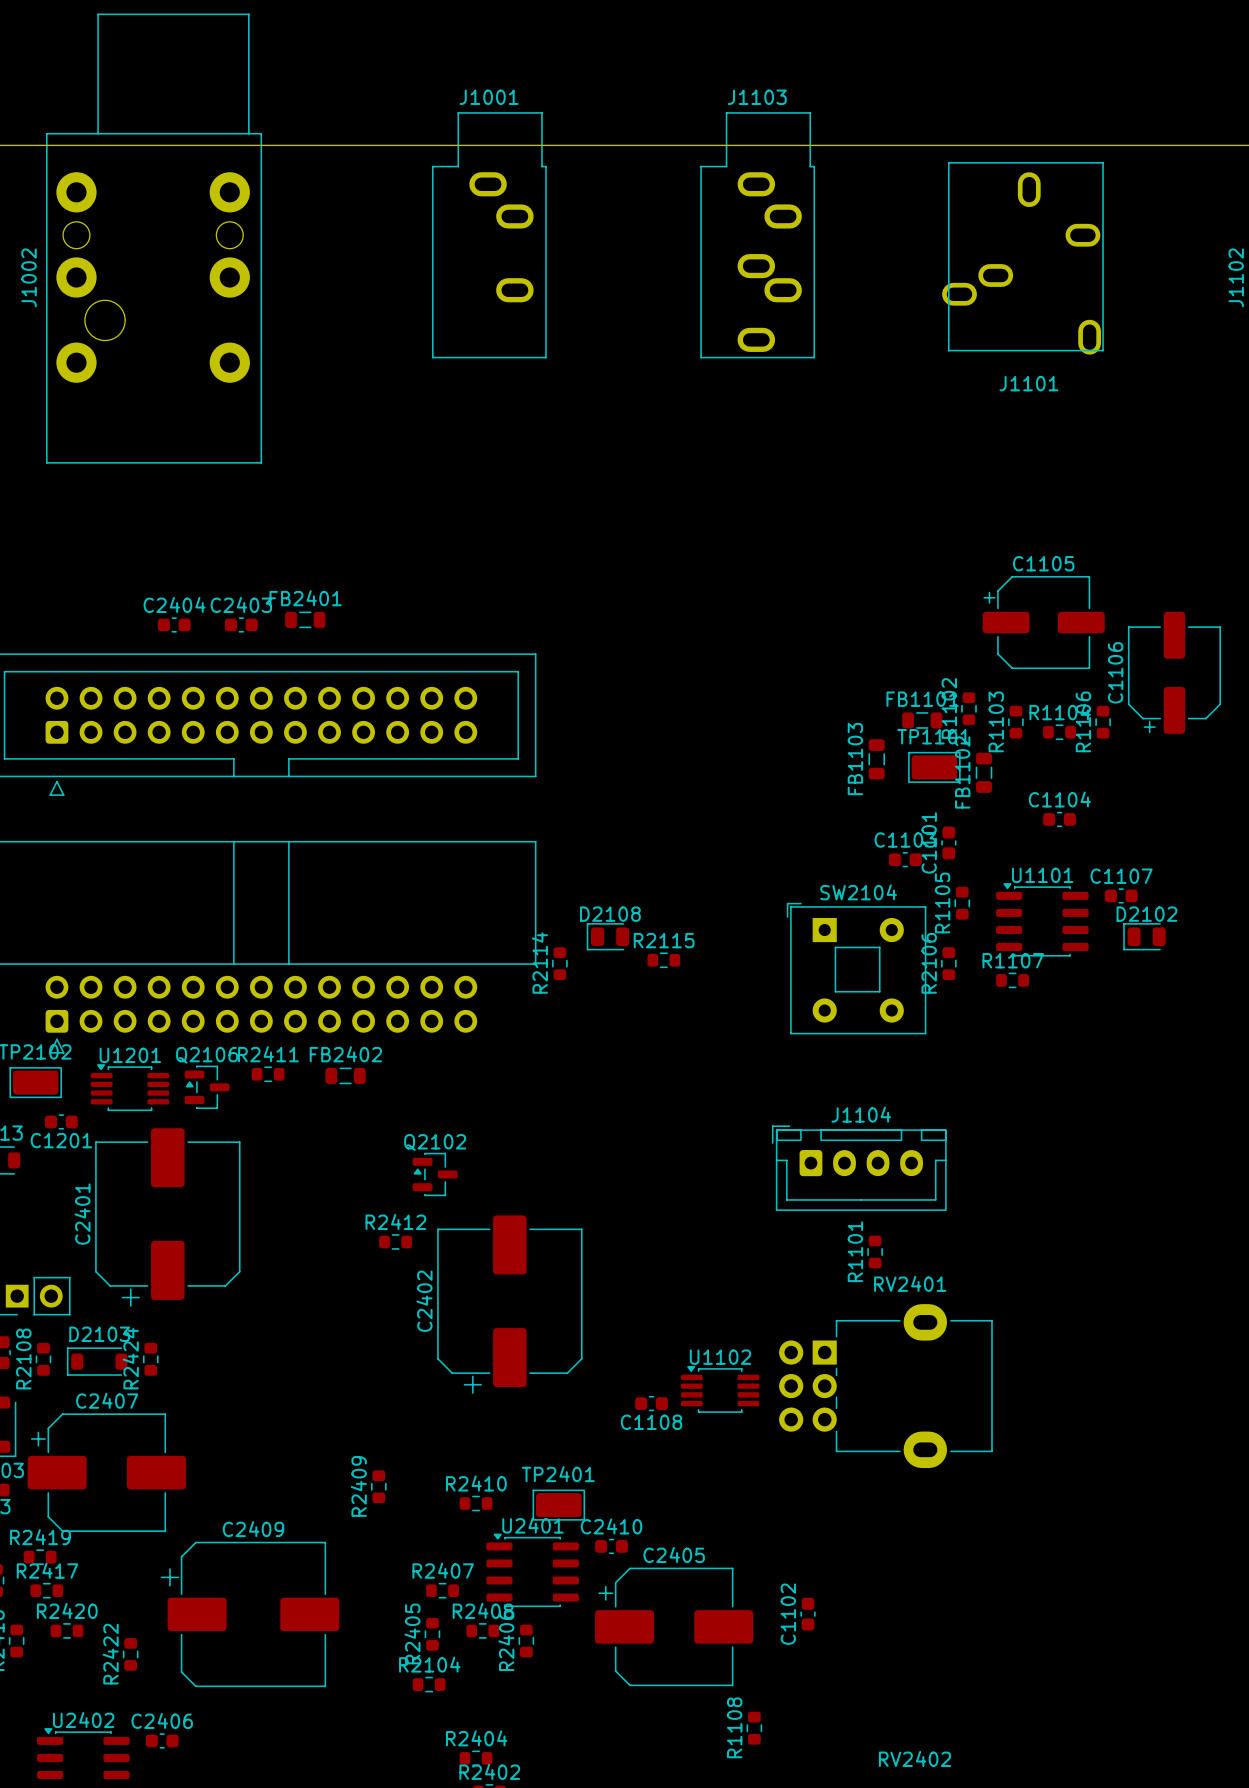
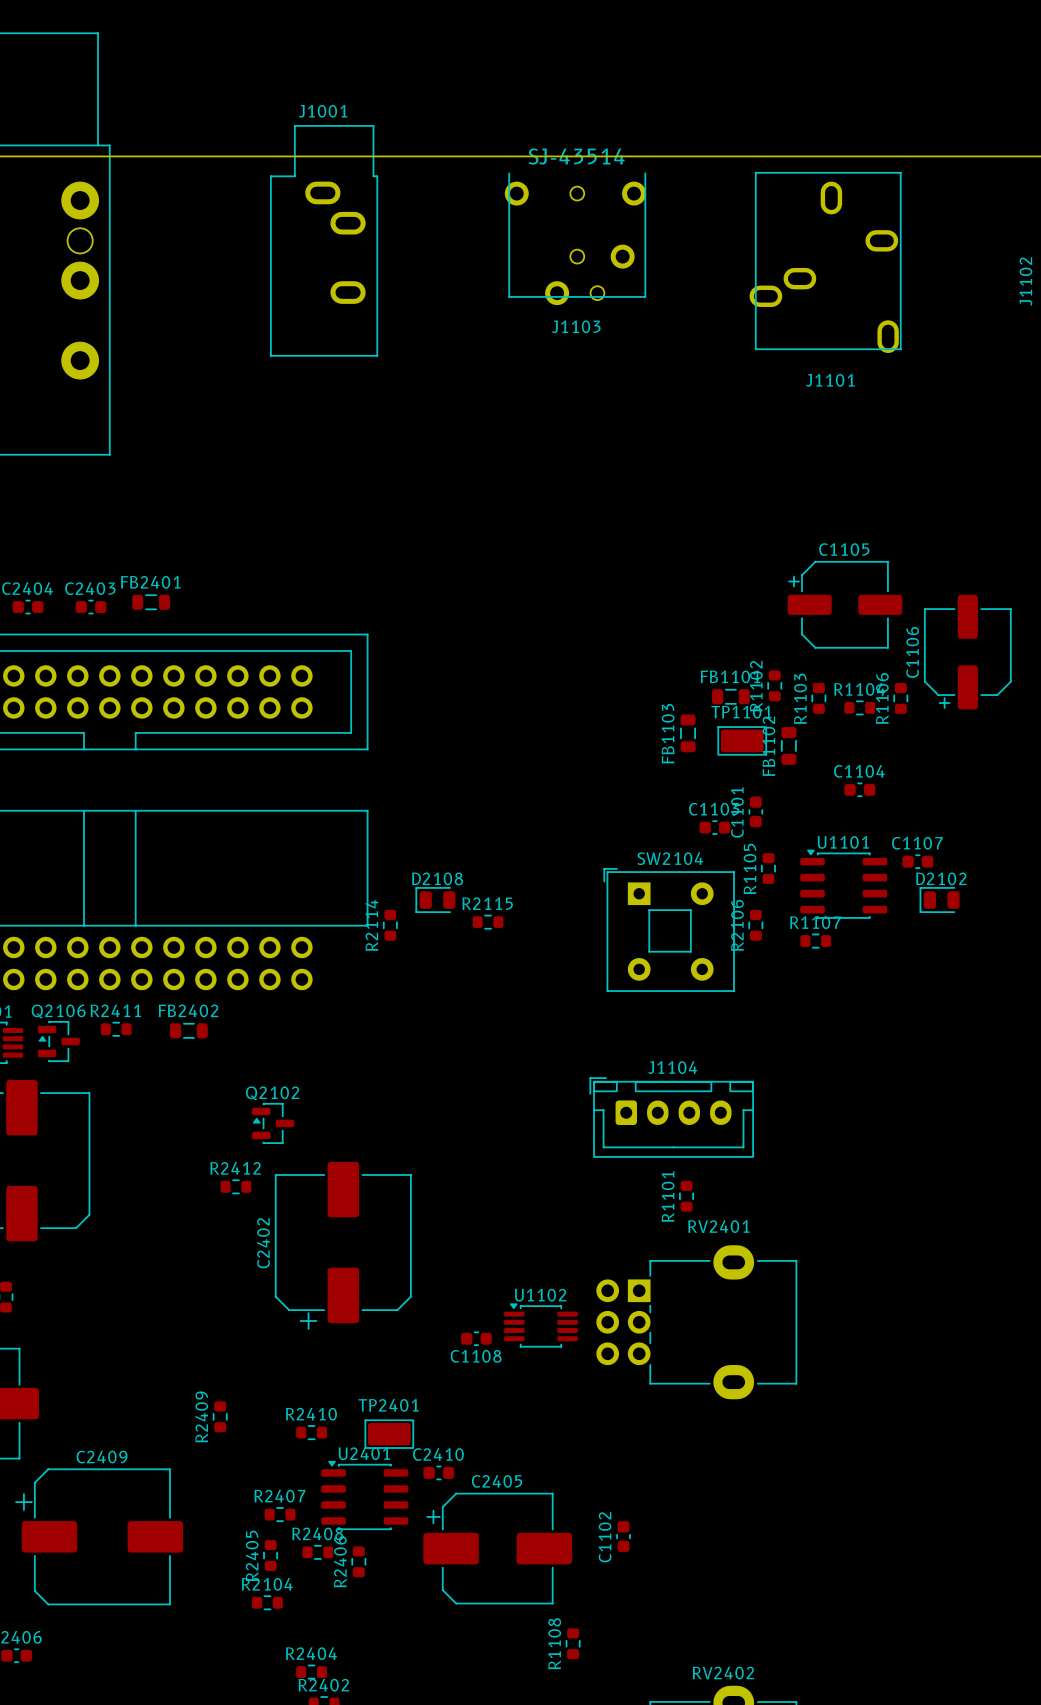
J1103 name position: J1103 (757, 97) -> J1103 (576, 326)
J1103 footprint: [700, 112, 816, 359] -> [504, 172, 647, 306]
J1103 text: none -> SJ-43514 (576, 156)

